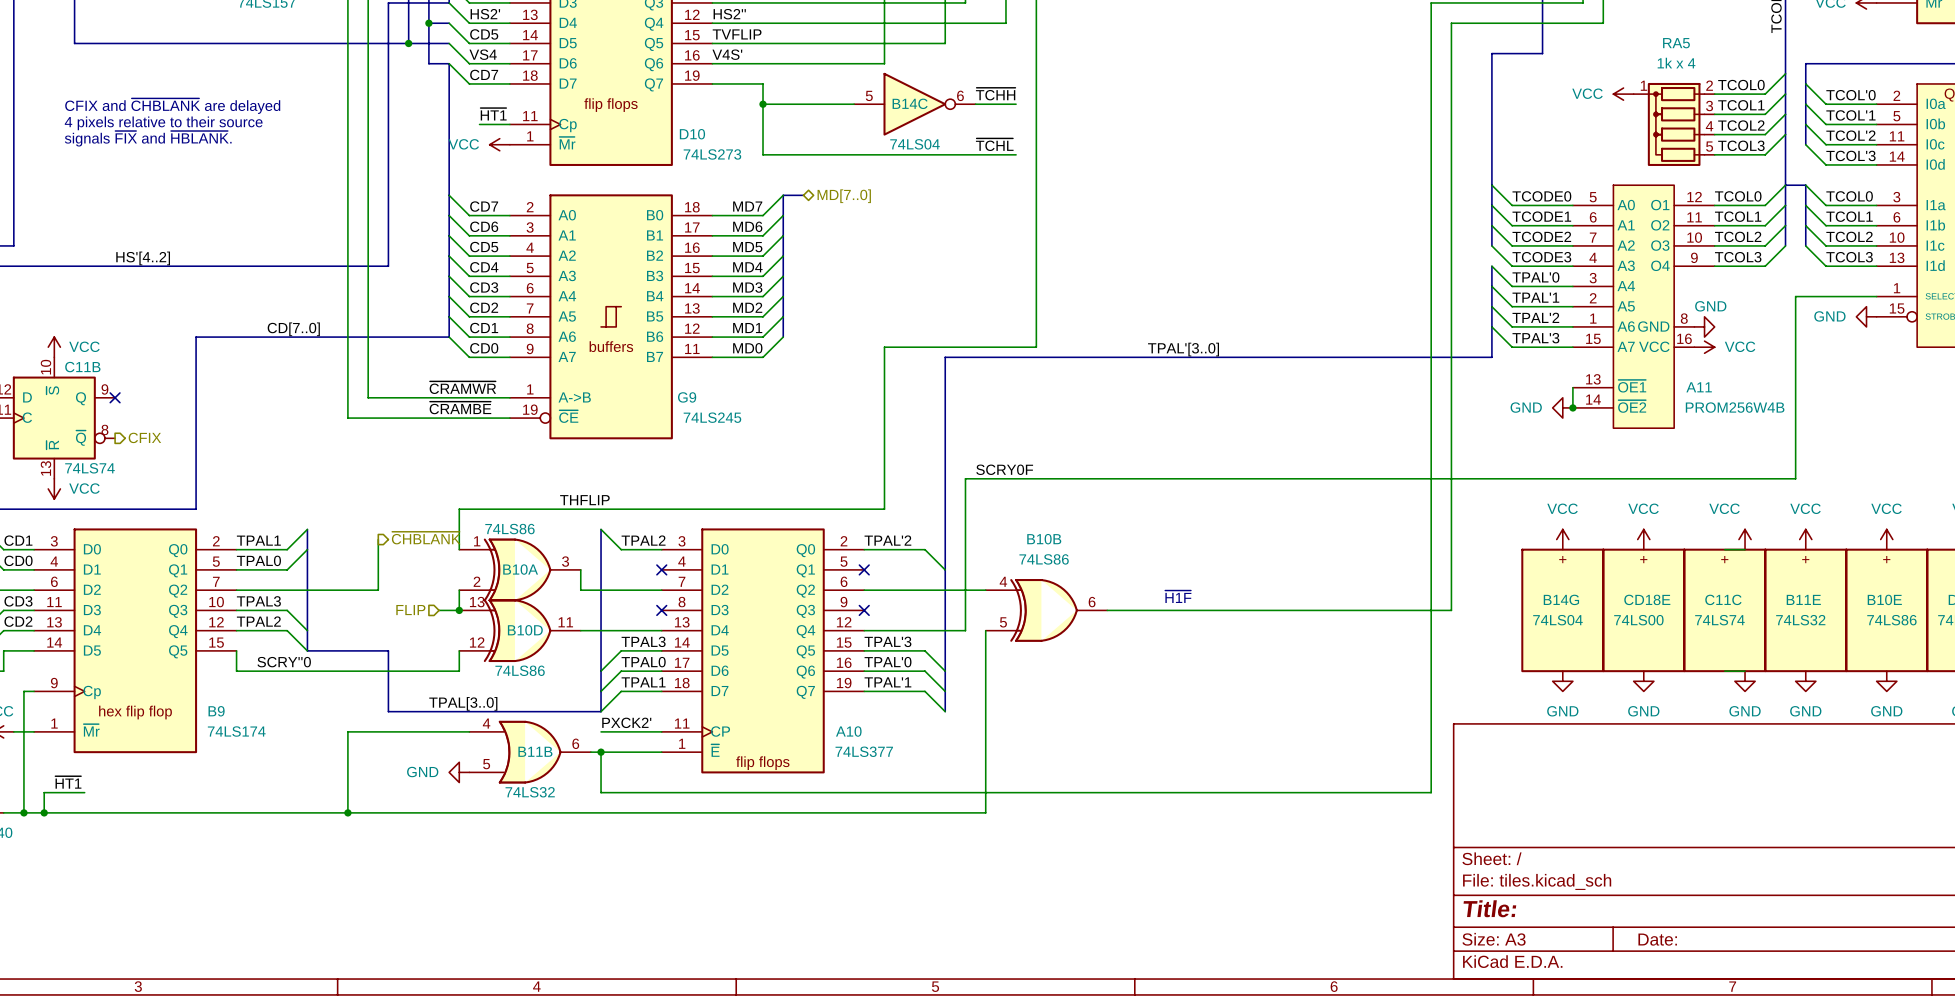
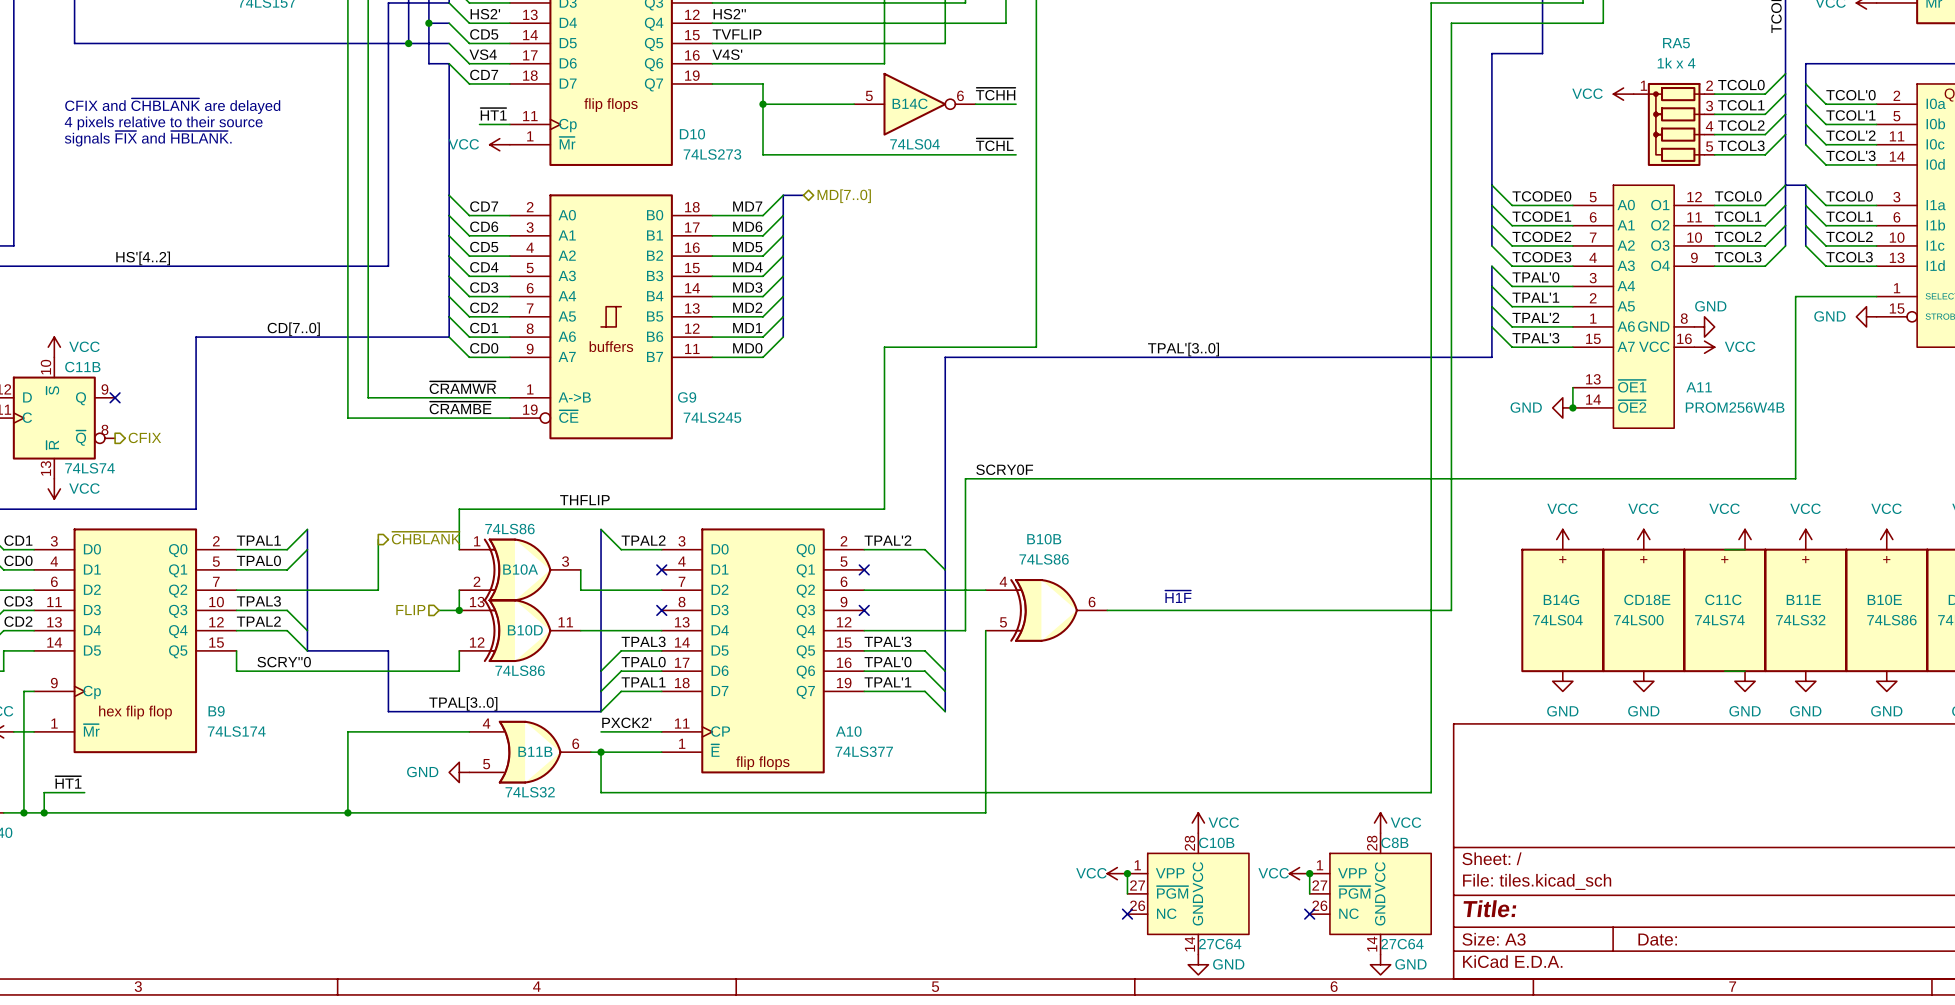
power symbol: none -> VCC (1198, 823)
power symbol: none -> VCC (1380, 823)
power symbol: none -> VCC (1117, 873)
wire: none -> (1127, 873) (1127, 893)
junction: none -> (1127, 873)
power symbol: none -> VCC (1299, 873)
wire: none -> (1309, 873) (1309, 893)
junction: none -> (1309, 873)
C10B: none -> 27C64 (1188, 893)
C8B: none -> 27C64 (1370, 893)
no-connect mark: none -> (1127, 914)
no-connect mark: none -> (1309, 914)
power symbol: none -> GND (1198, 964)
power symbol: none -> GND (1380, 964)

